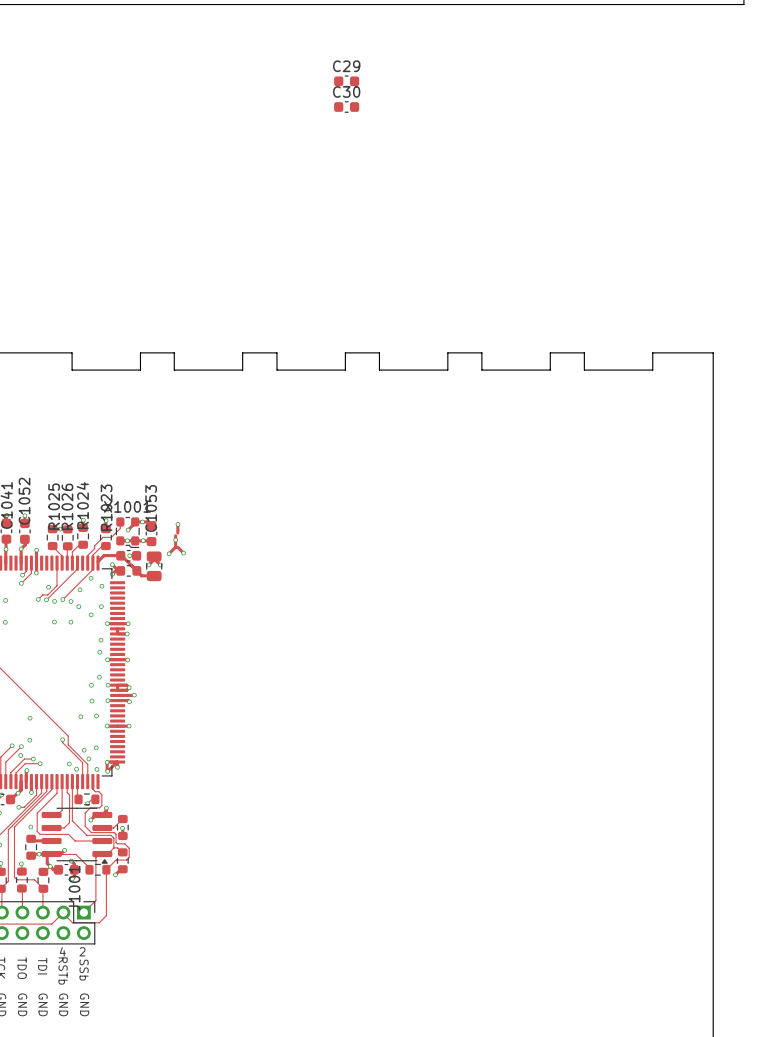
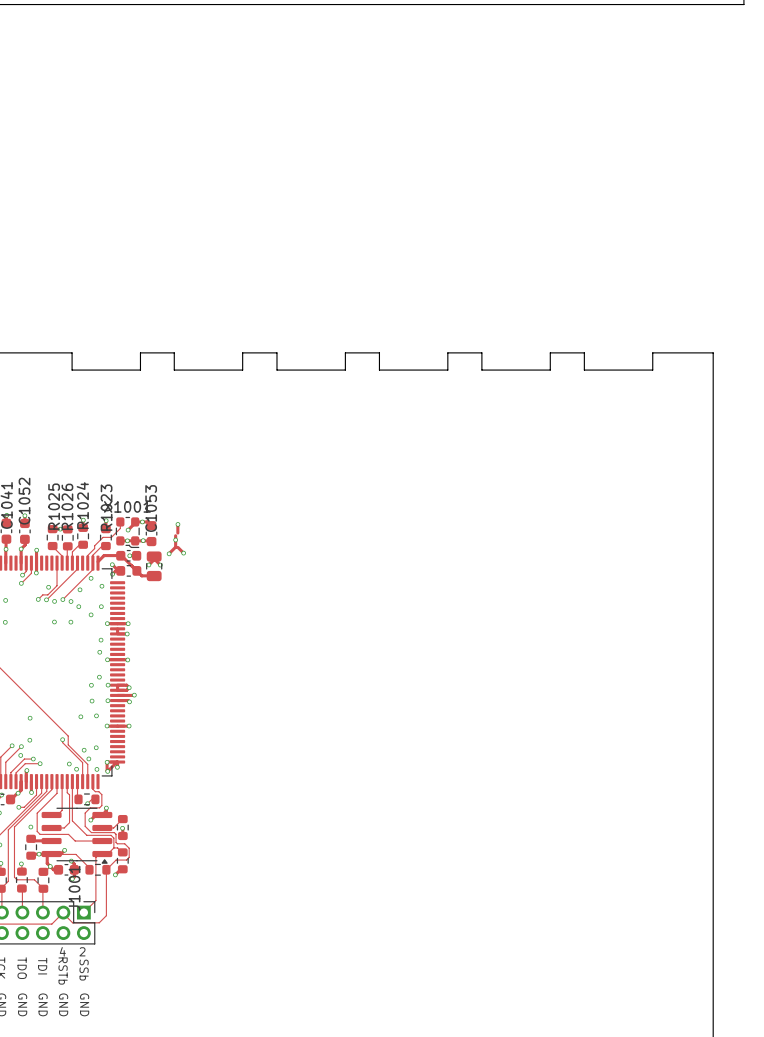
C29: (346, 81) -> none
C30: (346, 107) -> none

